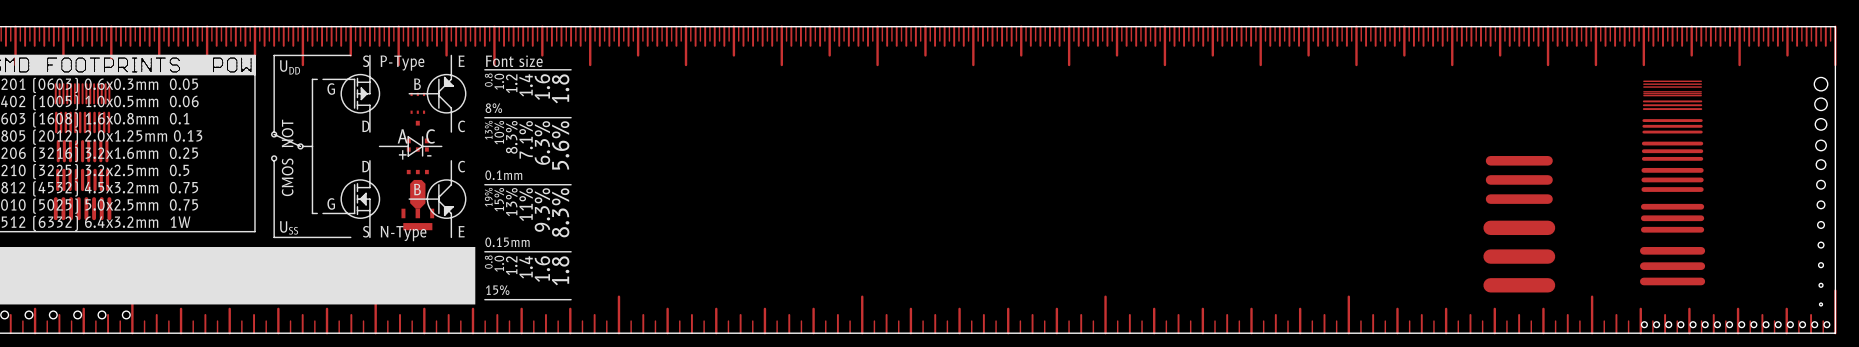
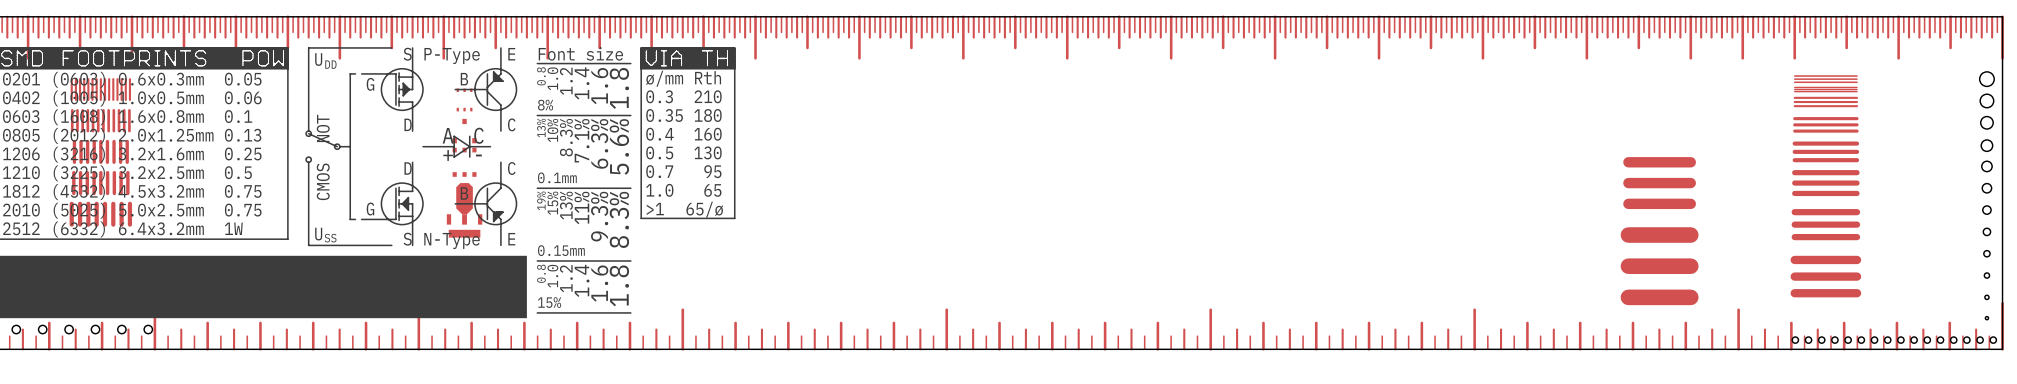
drawing: none -> [640, 47, 736, 220]

